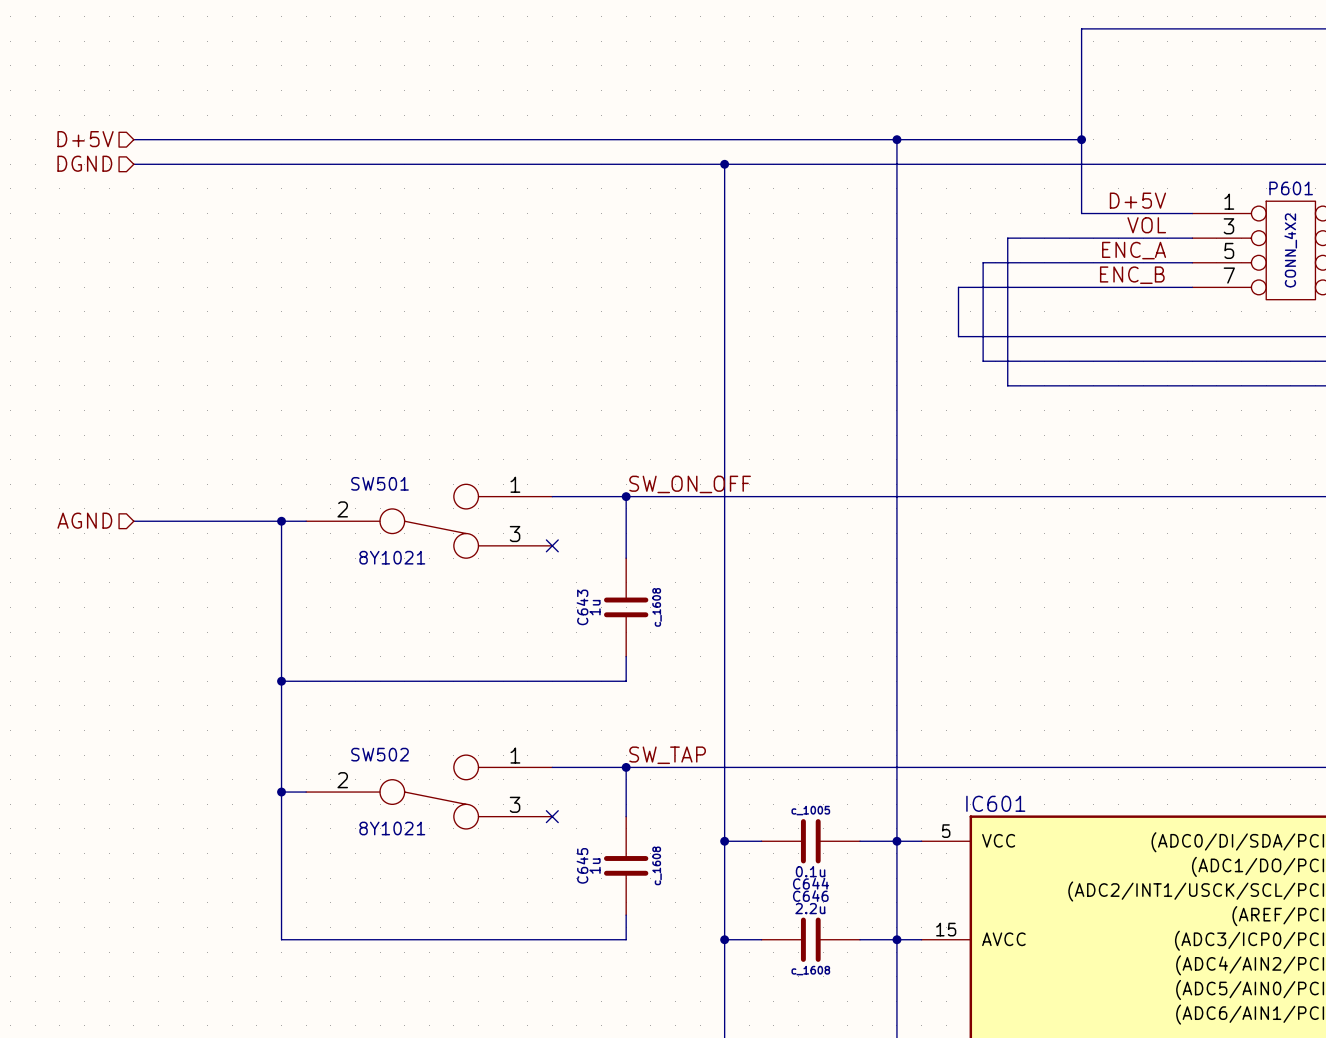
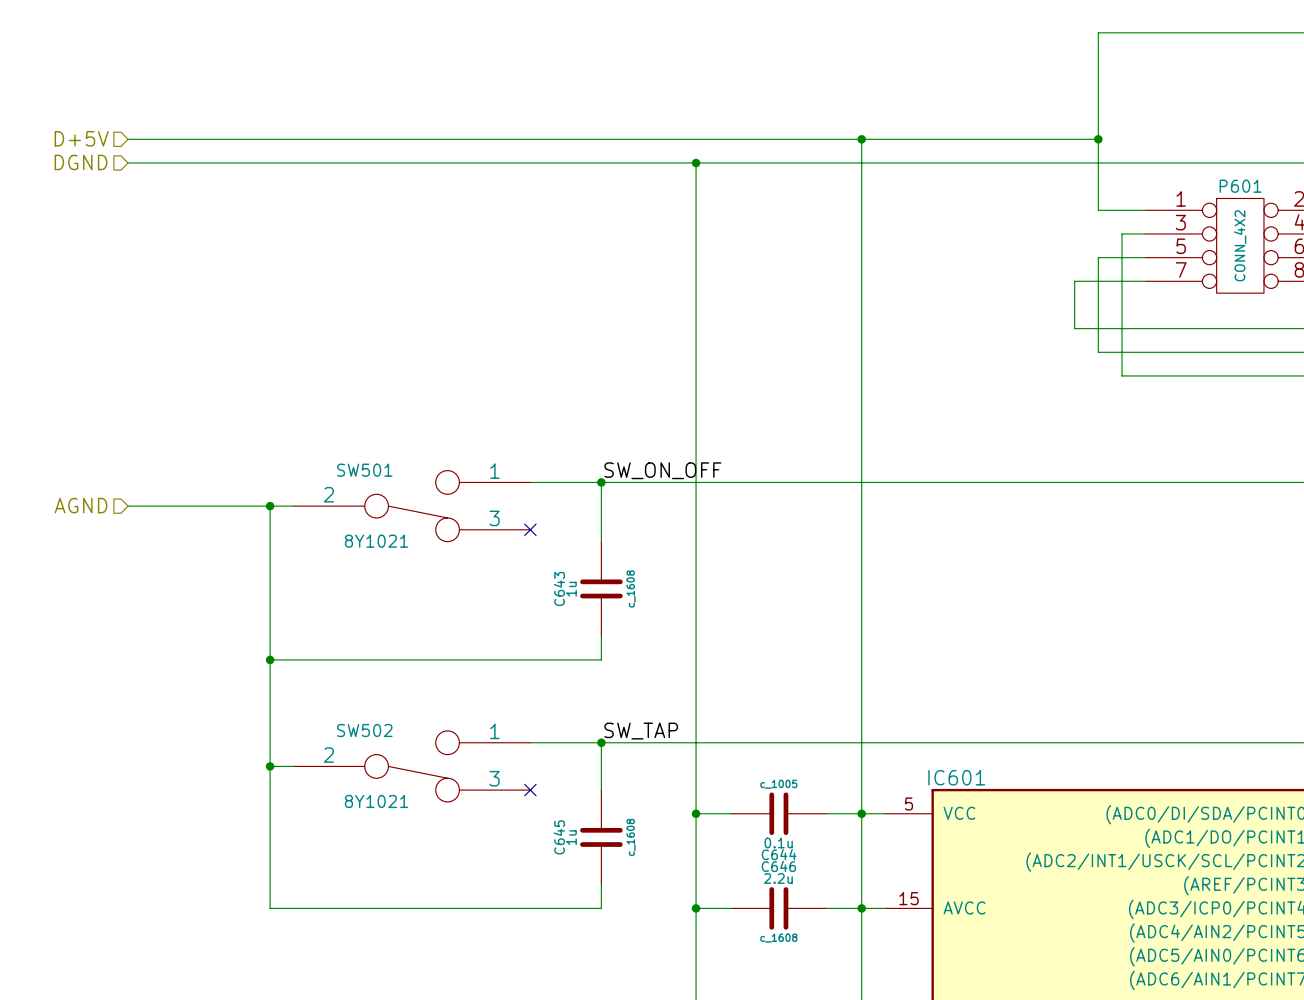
wire: (1143, 28) (1081, 28) (1081, 213) (1143, 213) -> (1098, 32) (1098, 210)
wire: none -> (1039, 139) (1098, 139)
junction: (1081, 139) -> none
junction: none -> (1098, 139)
label: D+5V (1137, 200) -> none
label: VOL (1146, 225) -> none
wire: (1167, 238) (1007, 238) (1007, 385) (1167, 385) -> (1121, 233) (1121, 375)
label: ENC_A (1134, 250) -> none
wire: (1143, 262) (983, 262) (983, 361) (1143, 361) -> (1098, 257) (1098, 352)
label: ENC_B (1132, 275) -> none
wire: (1118, 287) (958, 287) (958, 336) (1118, 336) -> (1074, 281) (1074, 328)

